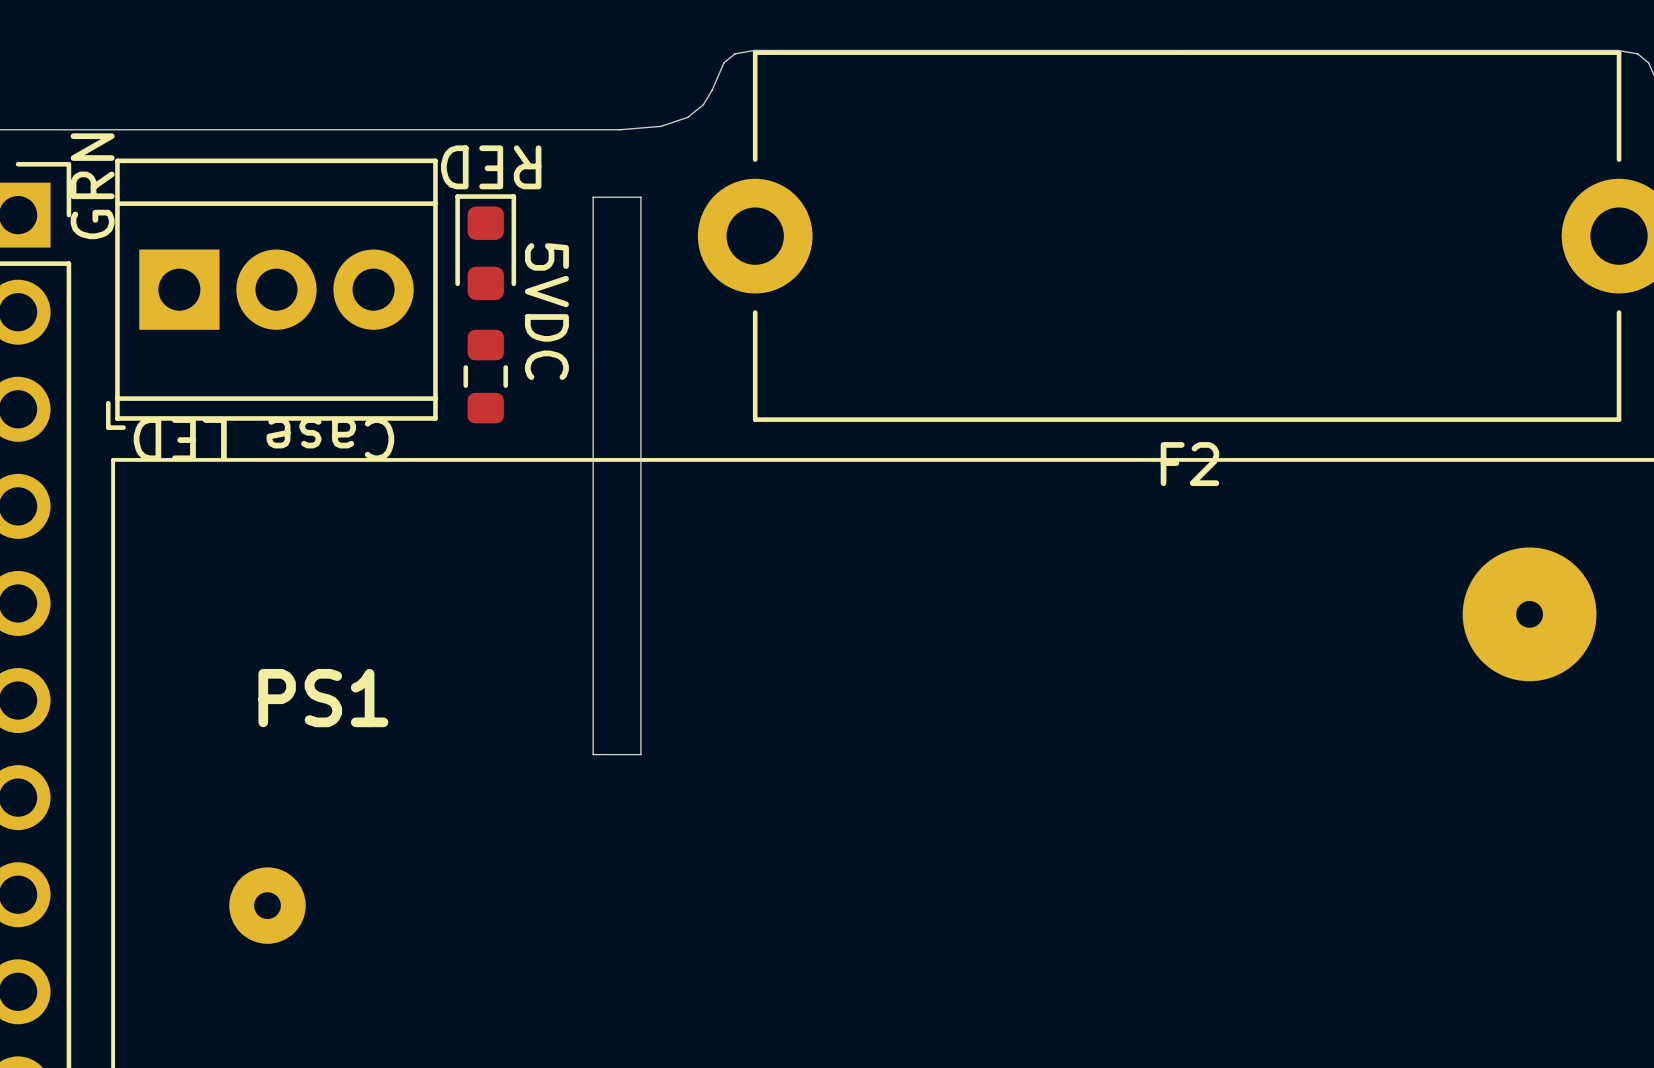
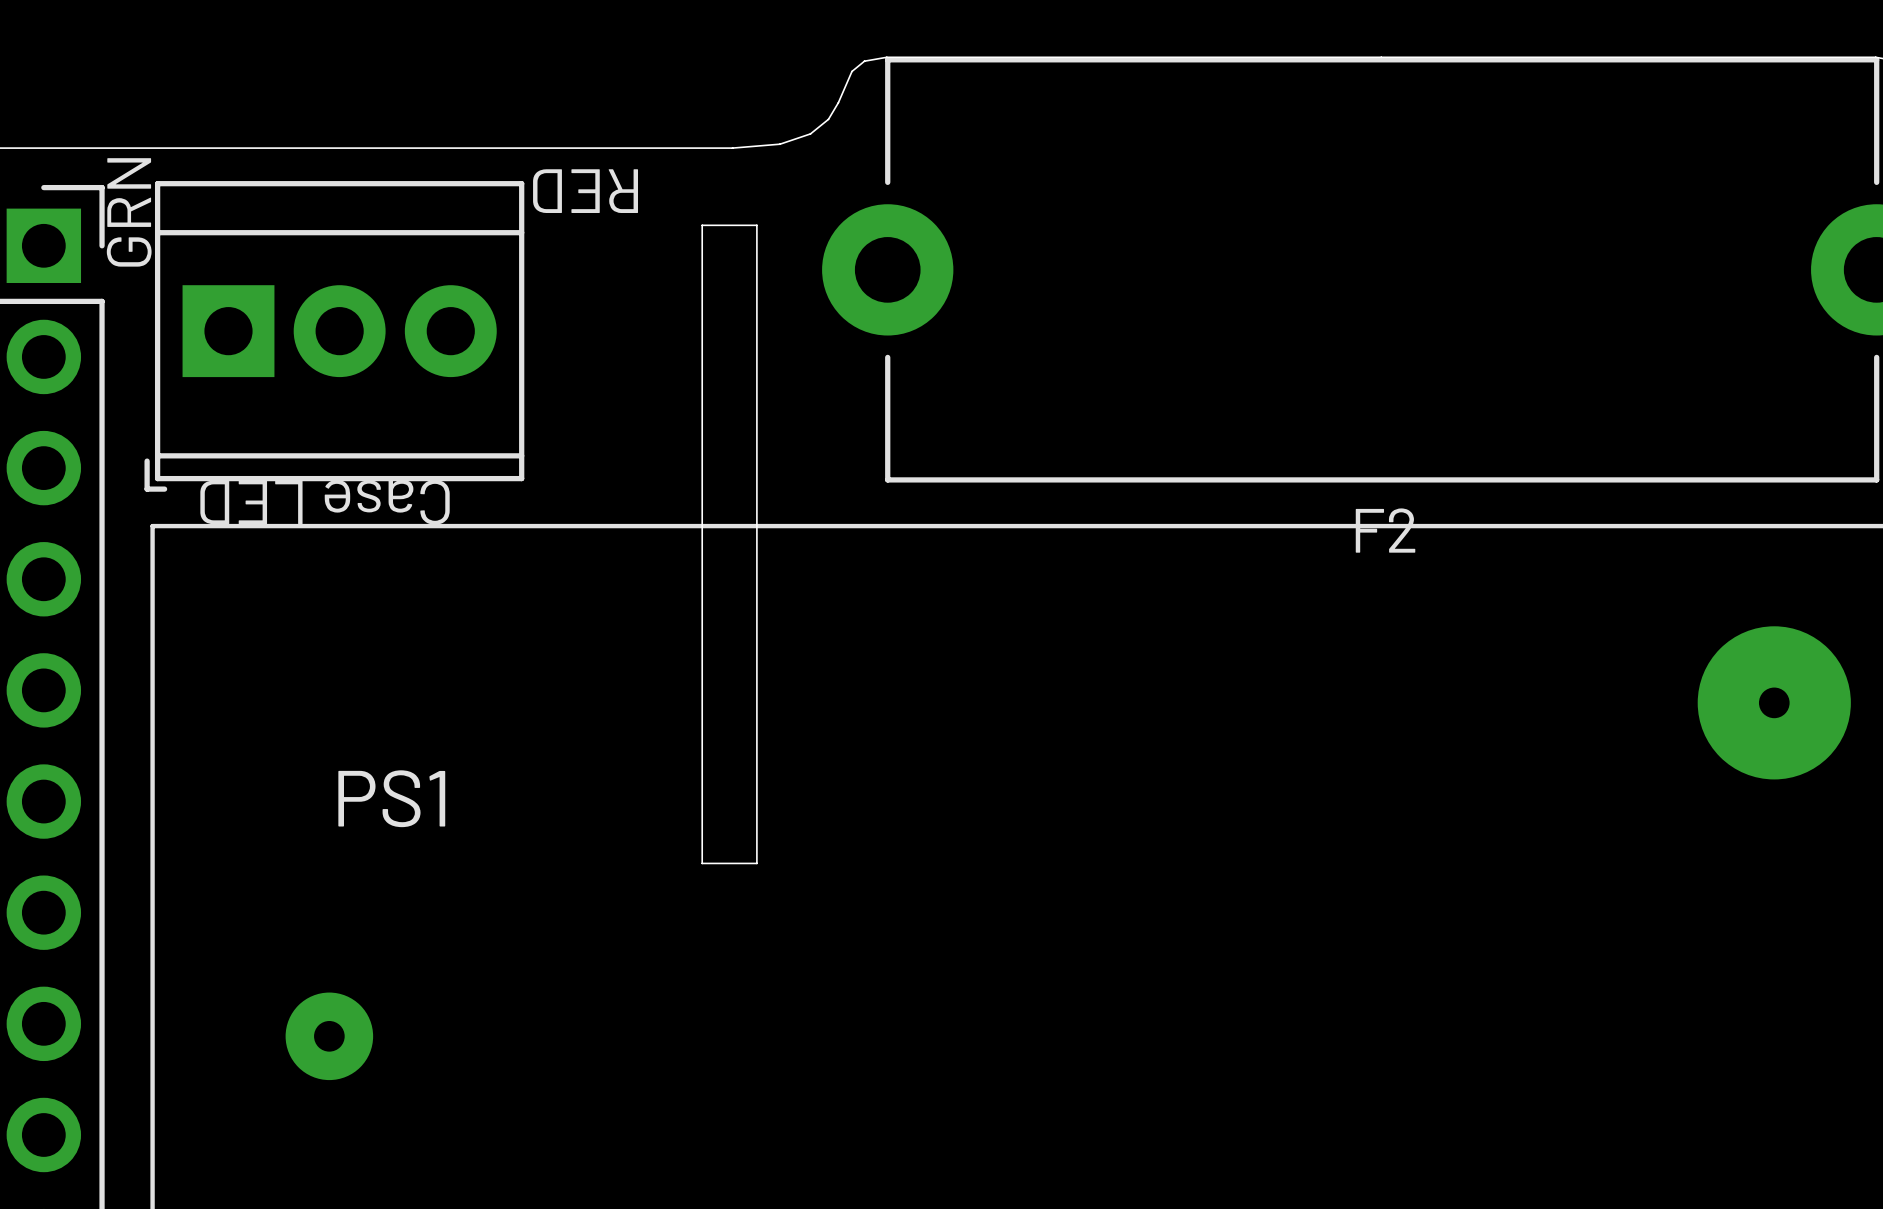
part: (485, 247) -> none
text: 5VDC (546, 311) -> none
part: (485, 376) -> none

